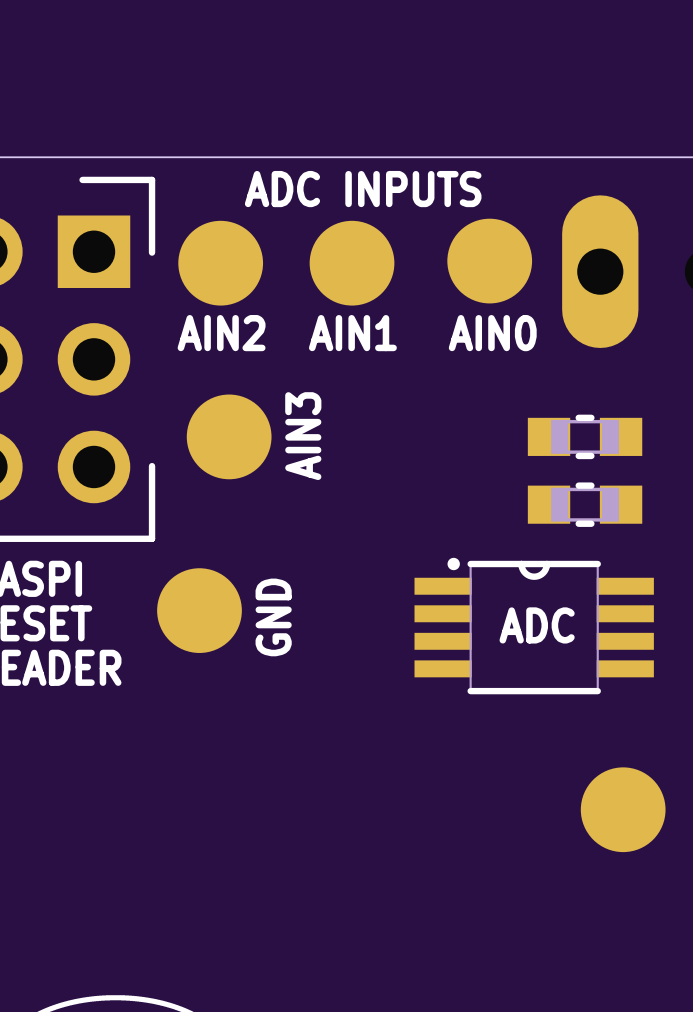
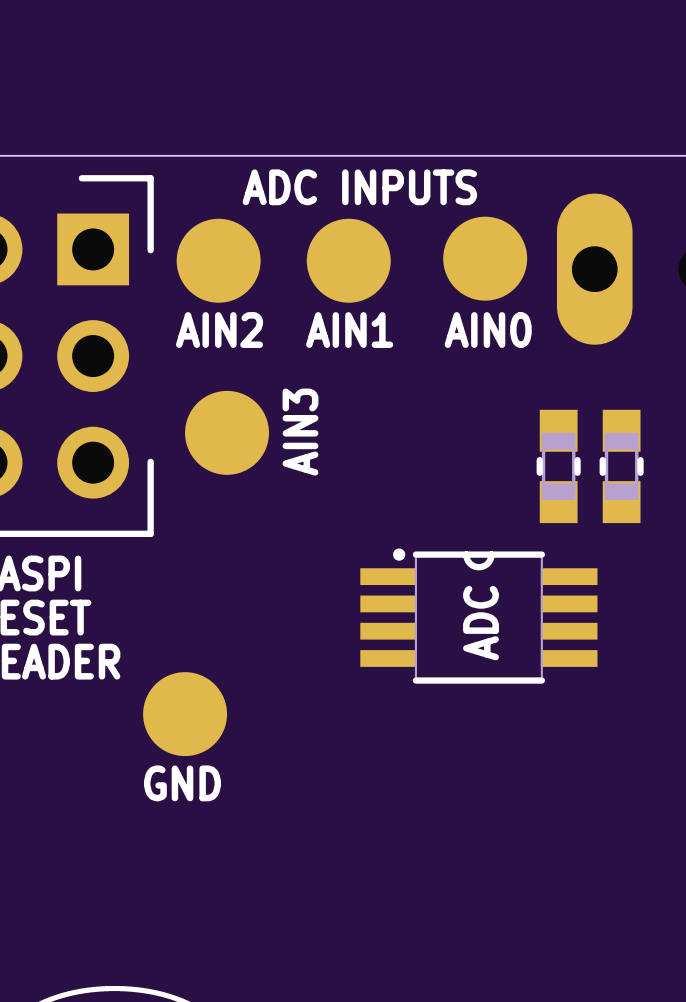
part: (585, 436) -> none
part: none -> (558, 466)
part: none -> (621, 466)
part: (585, 504) -> none
part position: (199, 610) -> (185, 714)
text rotation: 0° (273, 617) -> 90° clockwise (182, 783)
text position: GND (273, 617) -> GND (182, 783)
text rotation: 0° (537, 625) -> 90° counterclockwise (480, 623)
part position: (534, 626) -> (478, 616)
part: (623, 809) -> none

